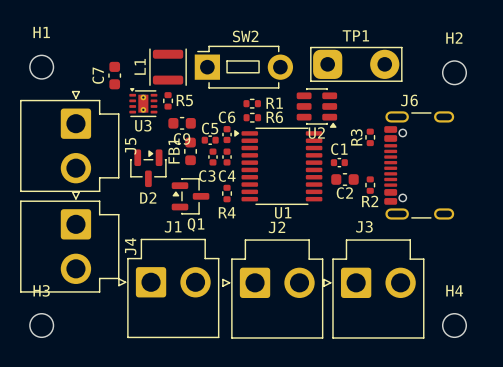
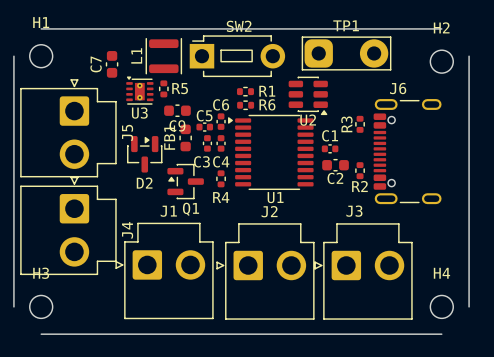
board edge: none -> (41, 28) (441, 28)
board edge: none -> (13, 56) (13, 306)
board edge: none -> (469, 56) (469, 306)
board edge: none -> (41, 334) (441, 334)

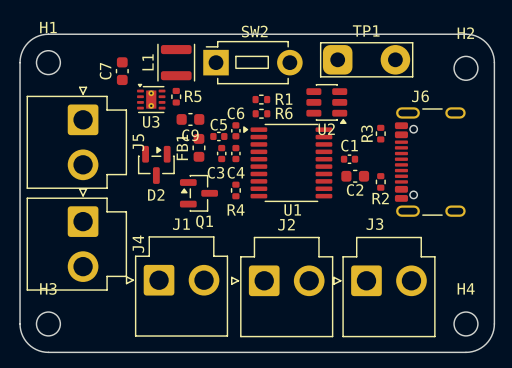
board edge: none -> (48, 34) (39, 35) (28, 42) (21, 53) (20, 62)
board edge: none -> (465, 34) (478, 37) (486, 42) (492, 53) (494, 62)
board edge: none -> (20, 323) (21, 333) (28, 344) (39, 350) (48, 352)
board edge: none -> (494, 323) (491, 336) (486, 344) (475, 350) (465, 352)

